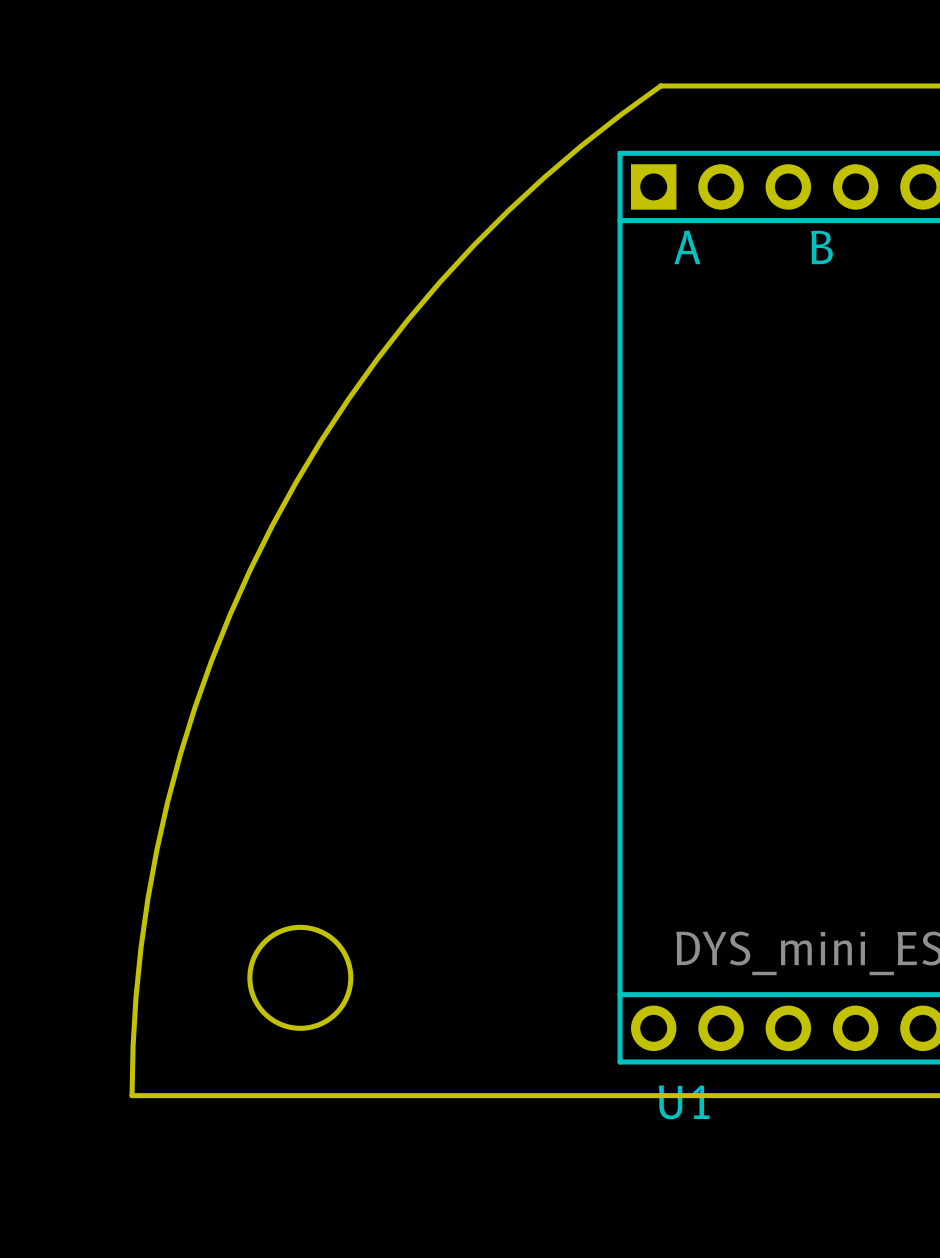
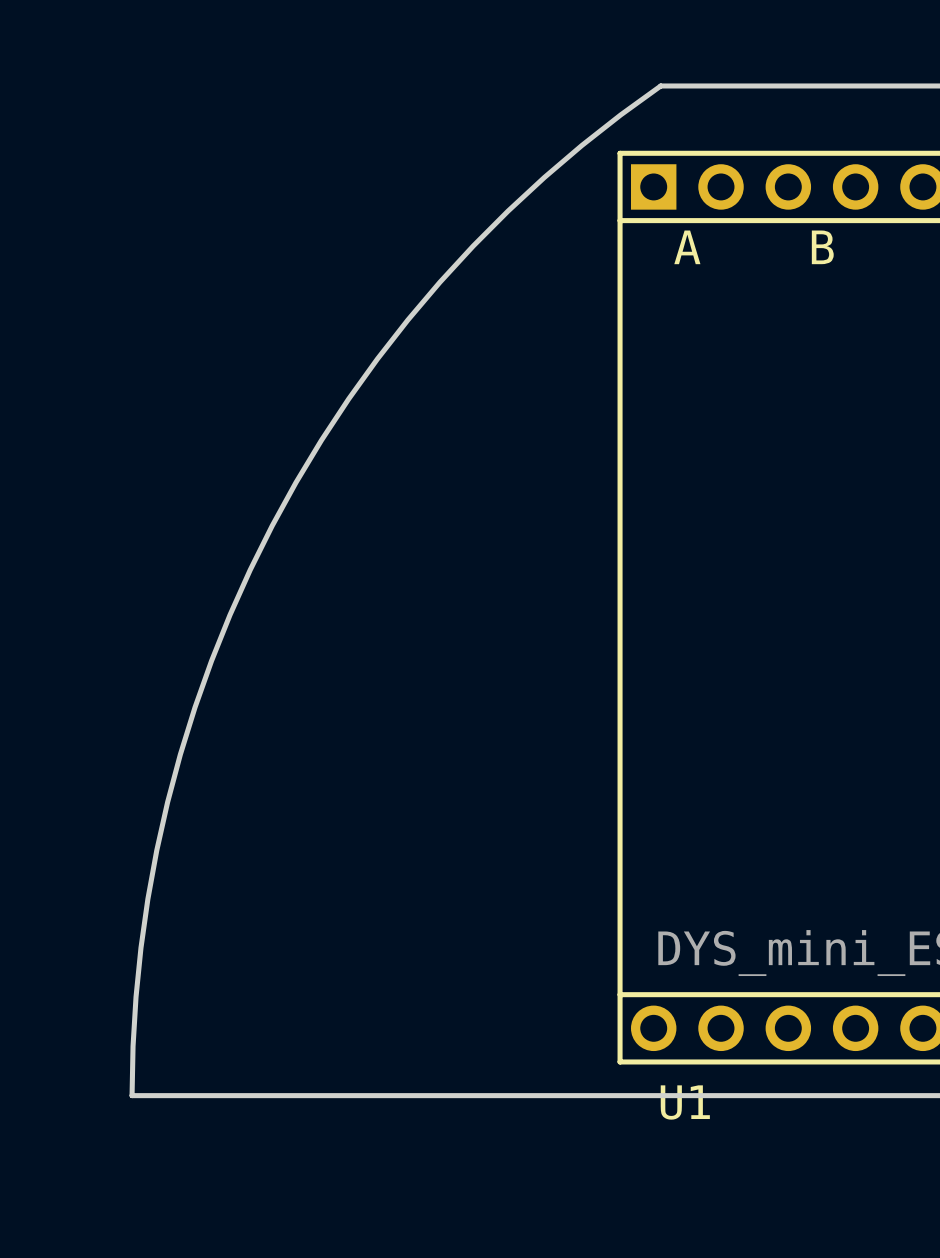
round board edge: [247, 924, 354, 1031] -> none

